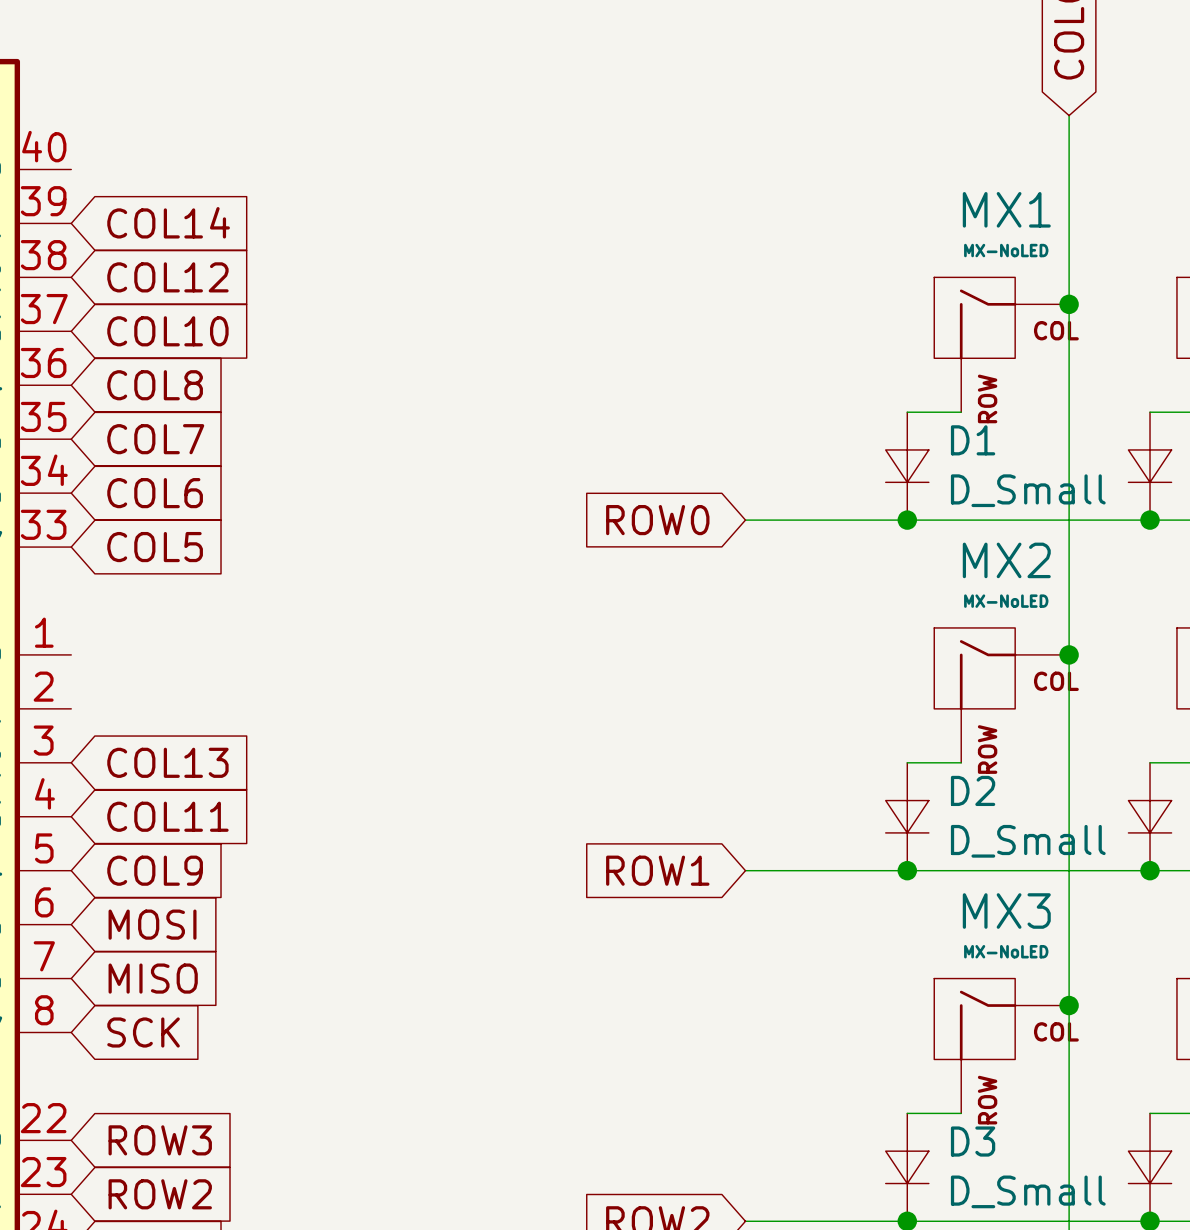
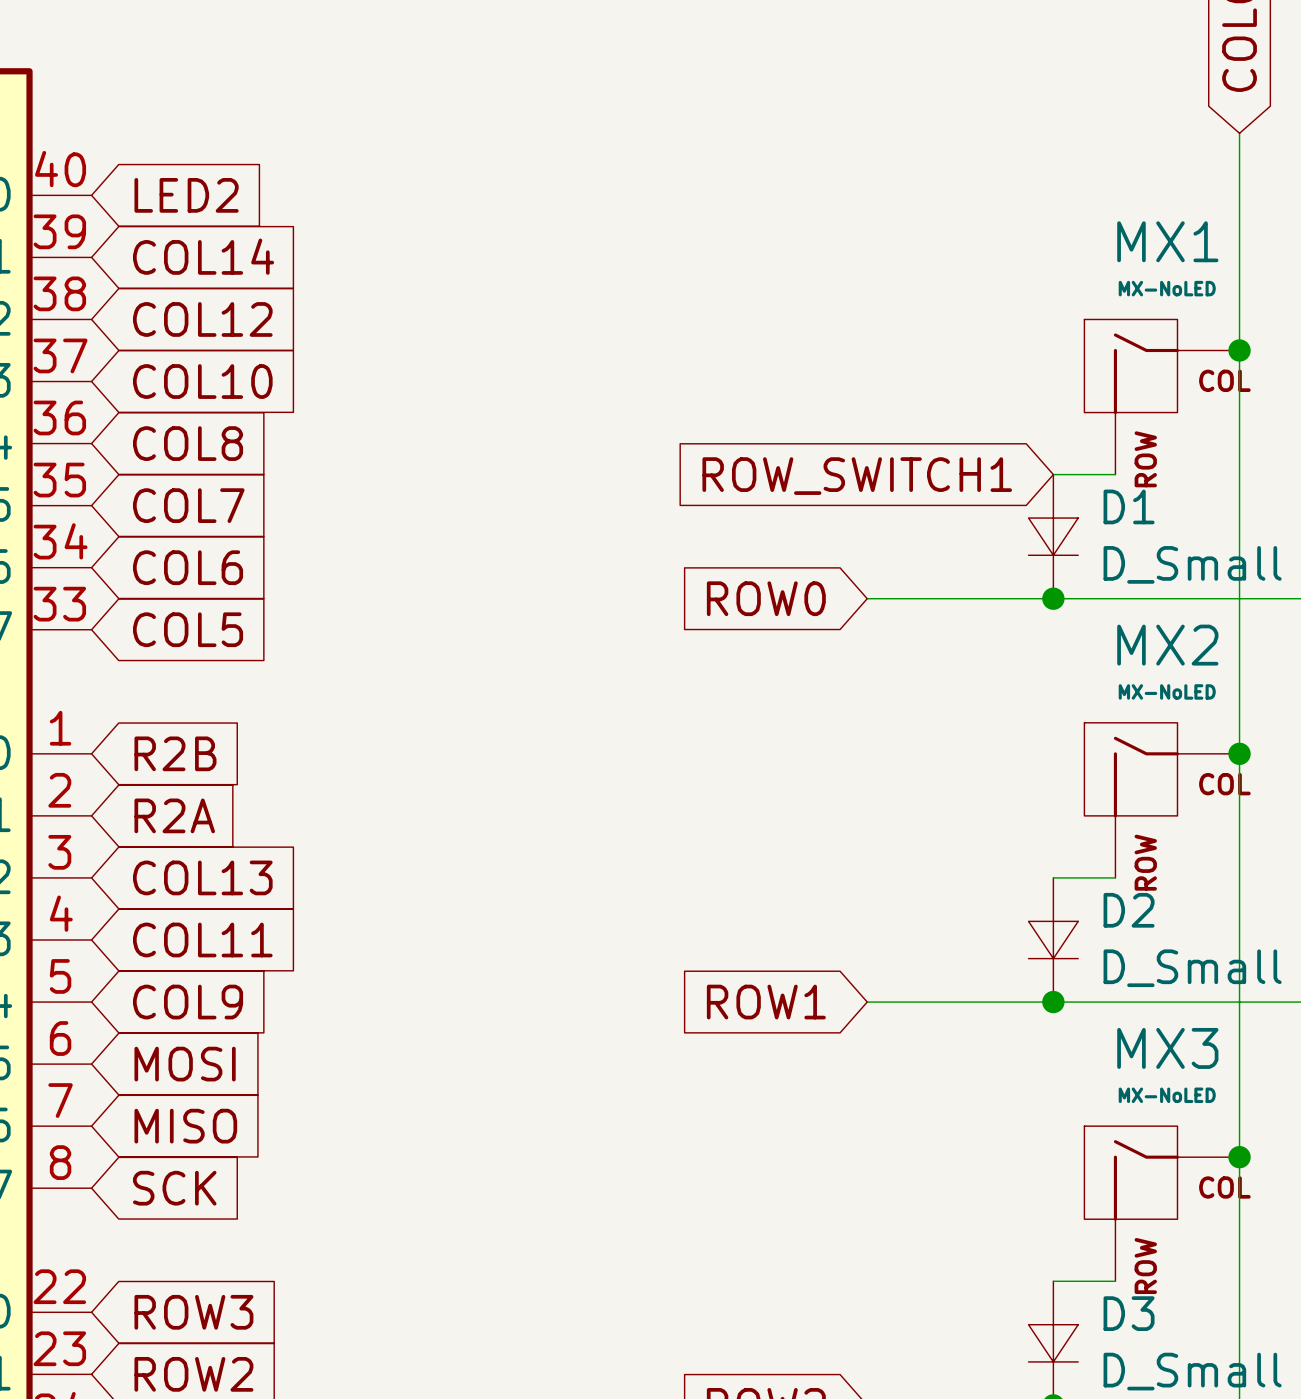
global label: none -> LED2 (186, 195)
global label: none -> ROW_SWITCH1 (857, 476)
global label: none -> R2B (175, 753)
global label: none -> R2A (174, 815)

